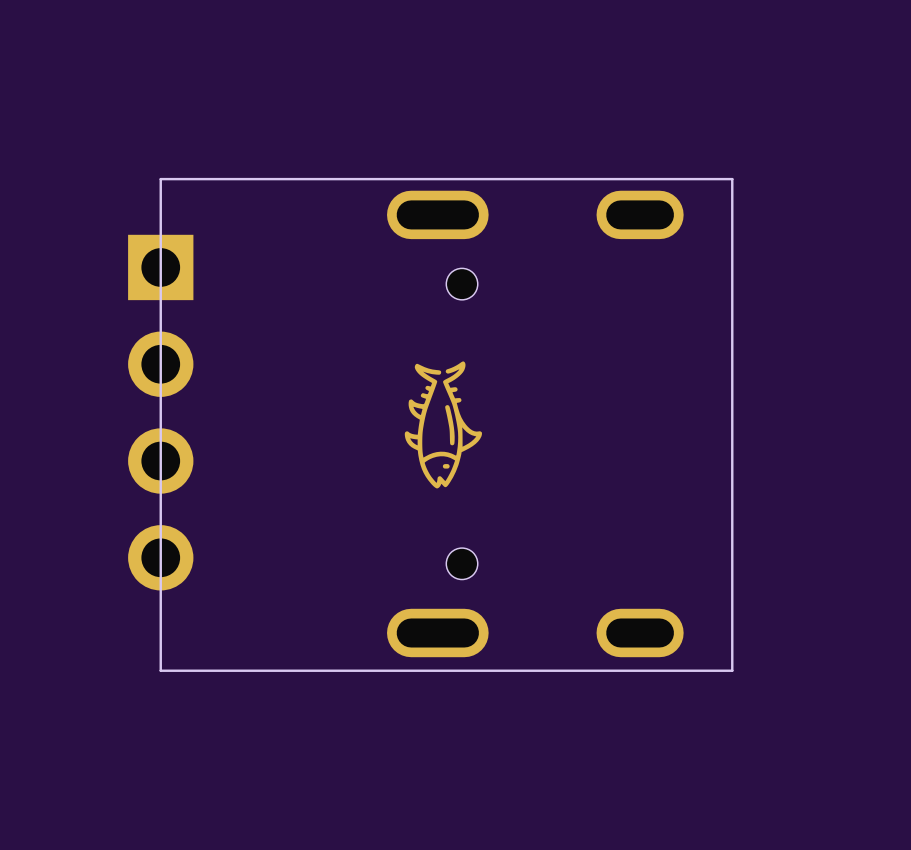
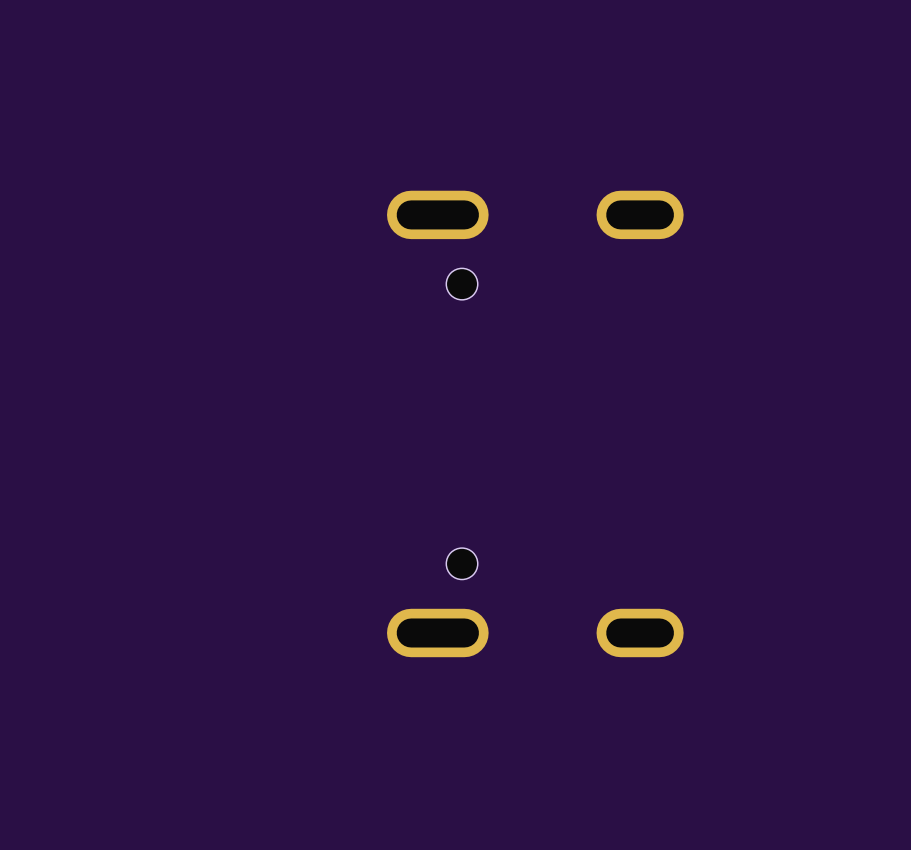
board edge: (732, 179) (160, 179) (160, 670) (732, 670) (732, 179) -> none
part: (160, 412) -> none
part: (443, 424) -> none

